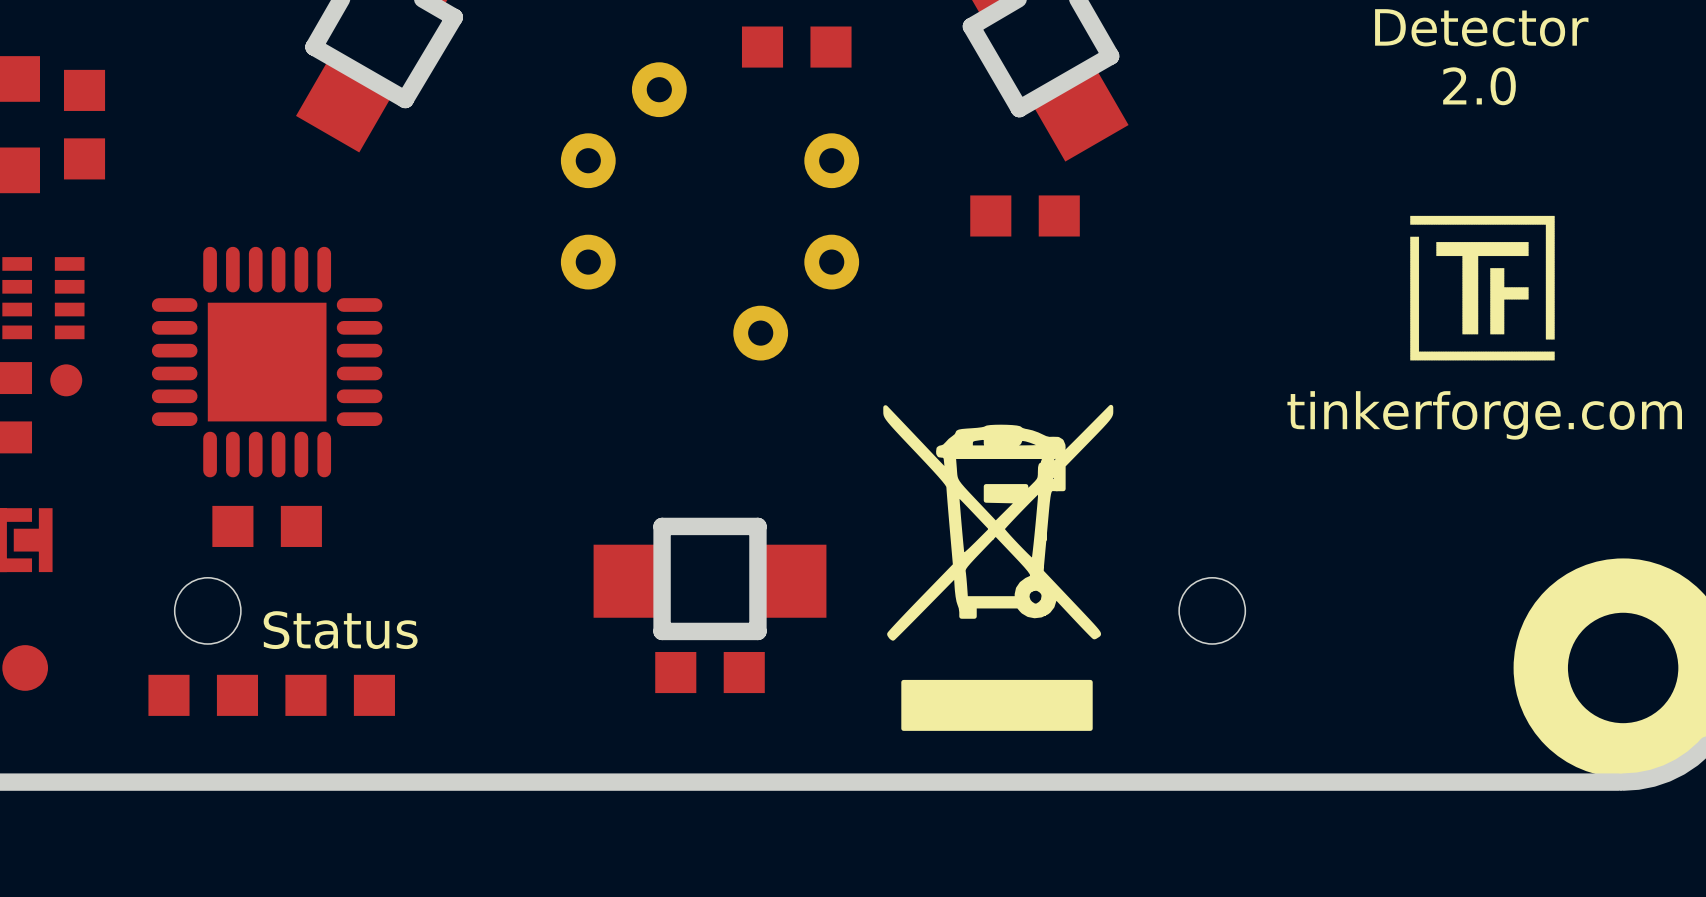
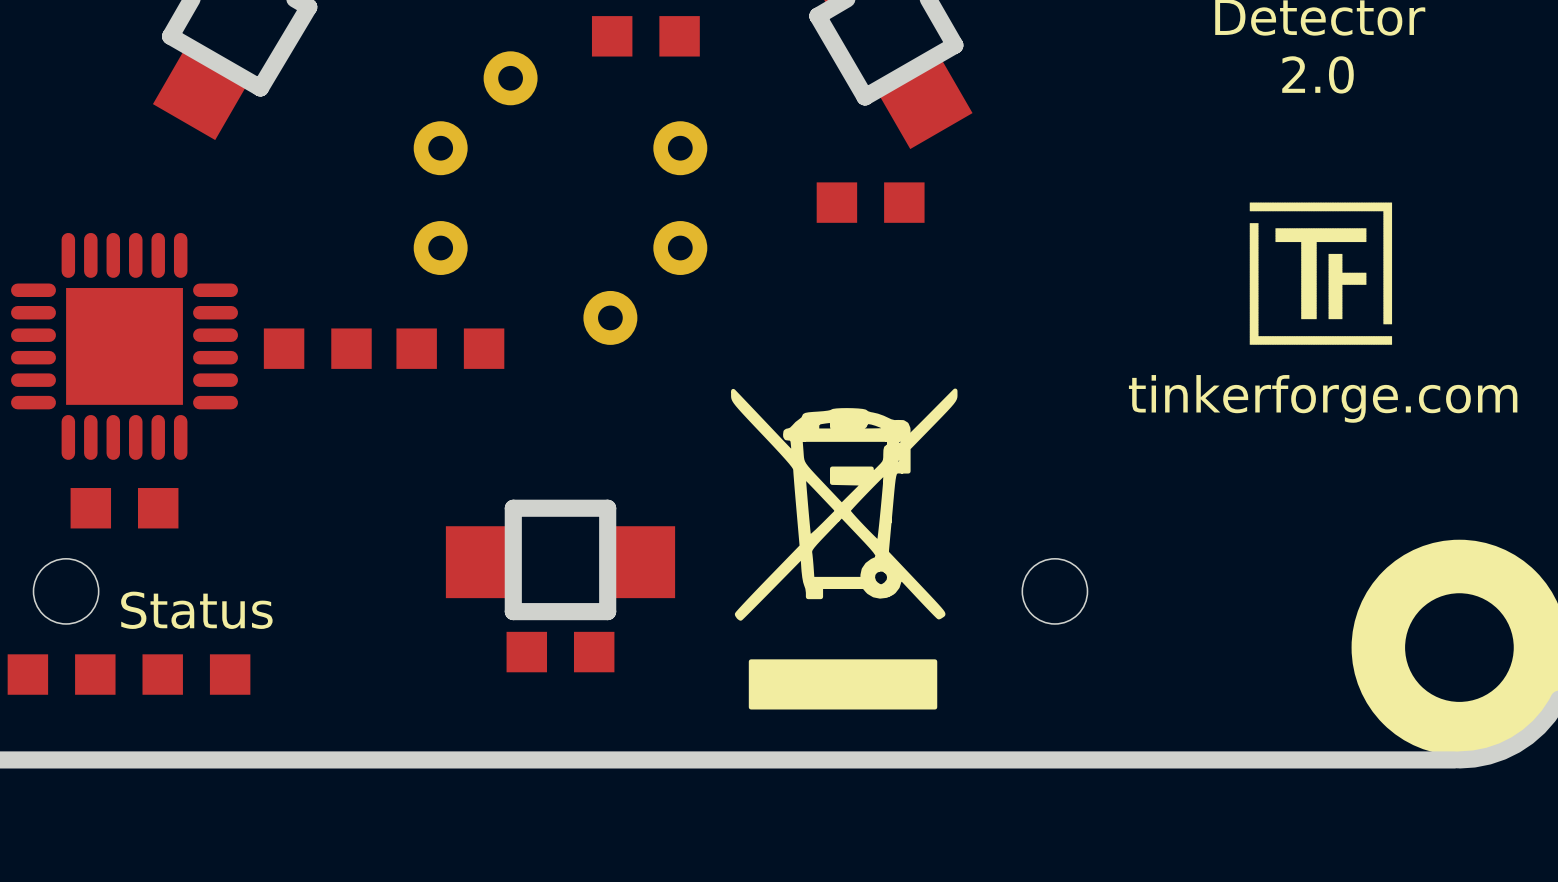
part: none -> (317, 348)
part: none -> (450, 348)

